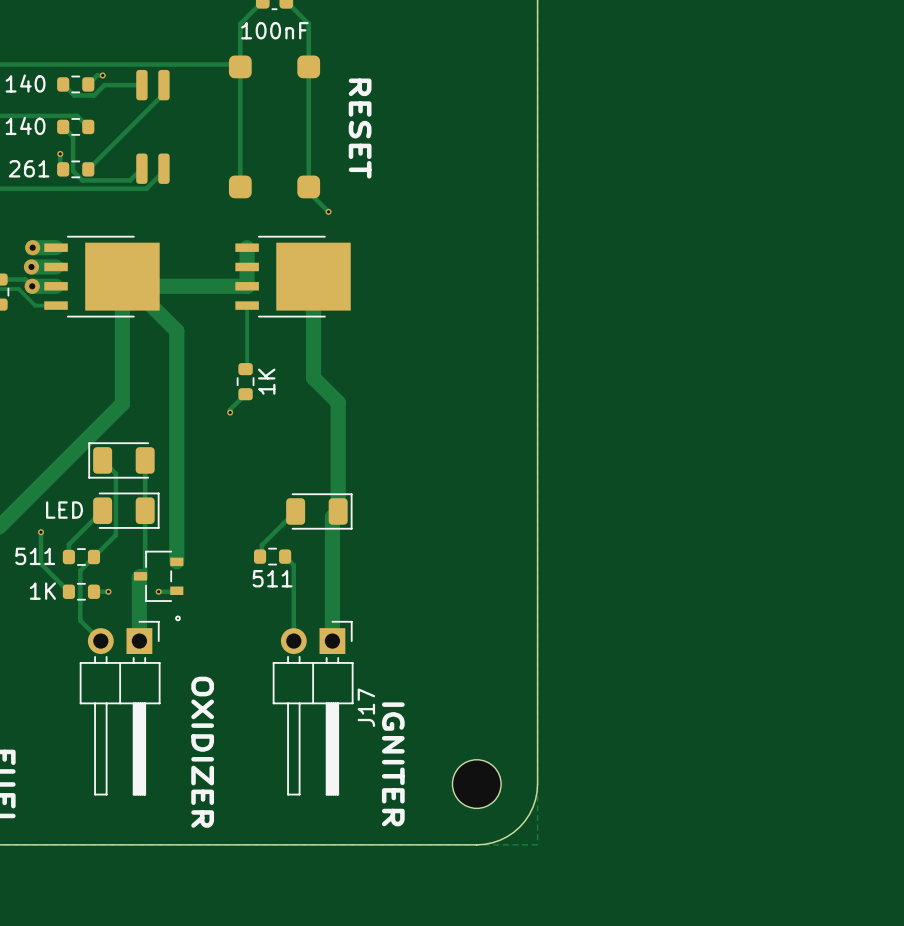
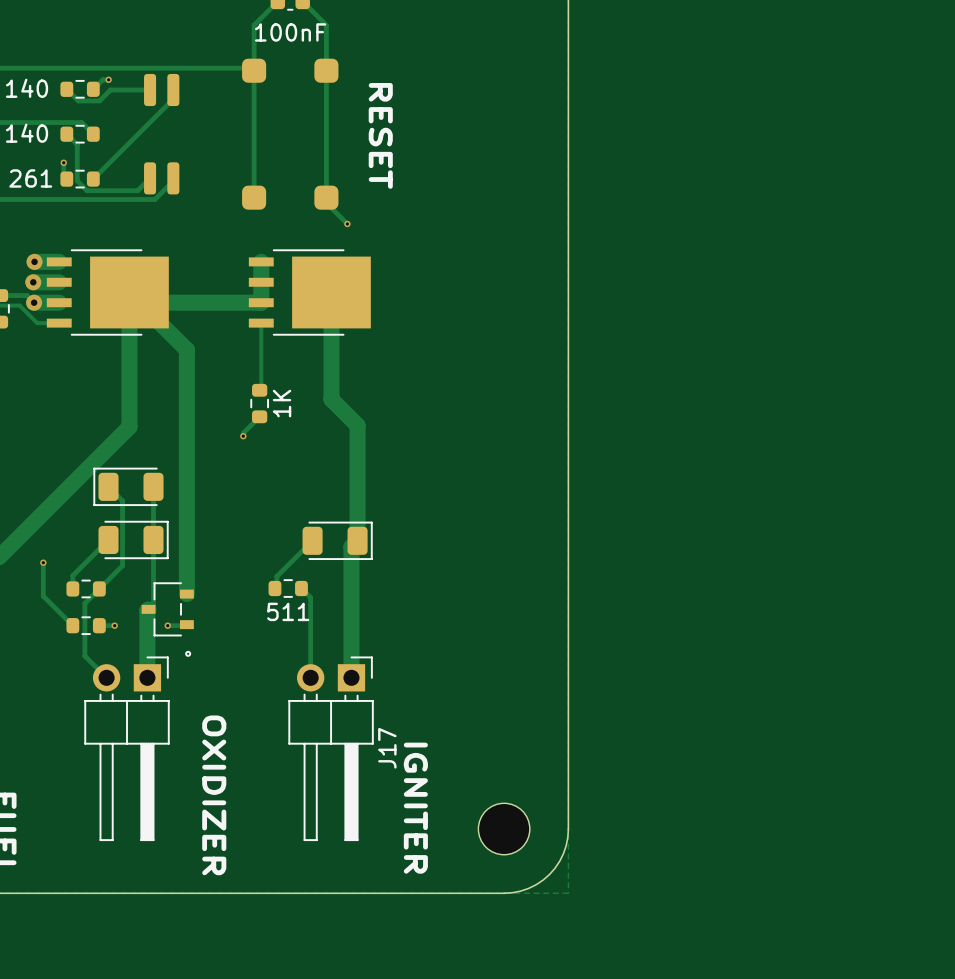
part value: LED (64, 510) -> none
part value: 511 (35, 556) -> none
part value: 1K (42, 591) -> none

